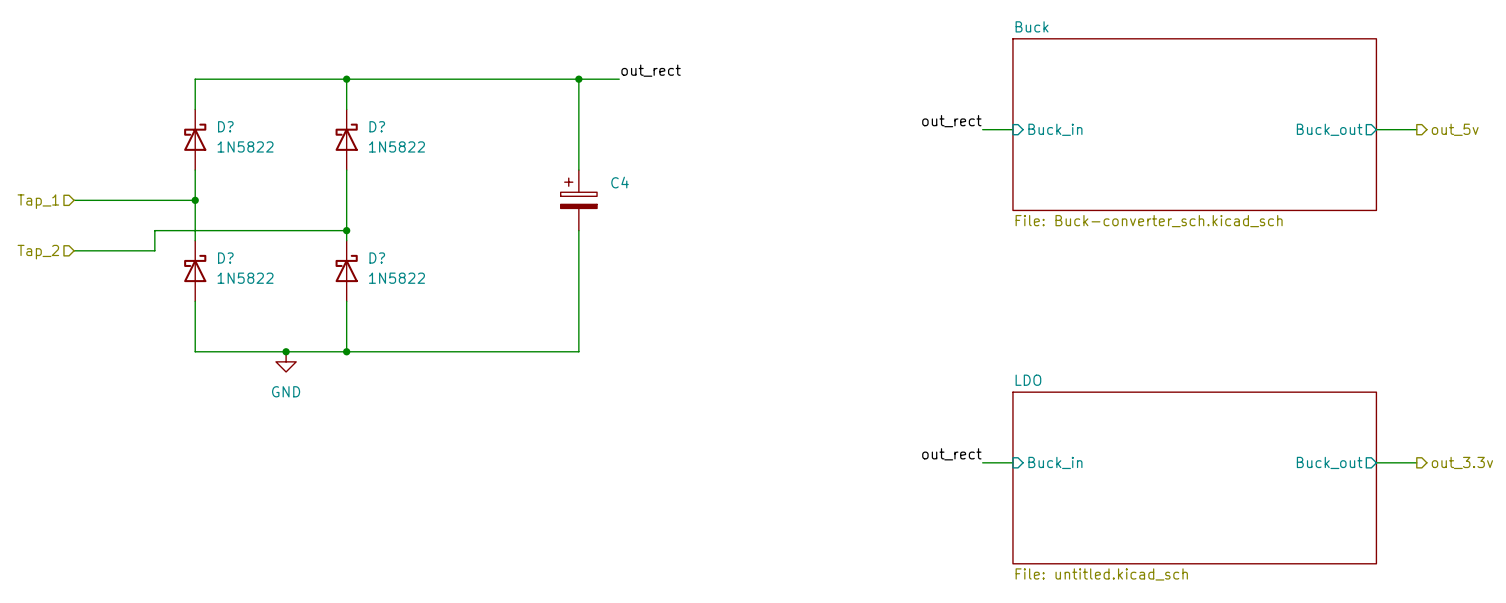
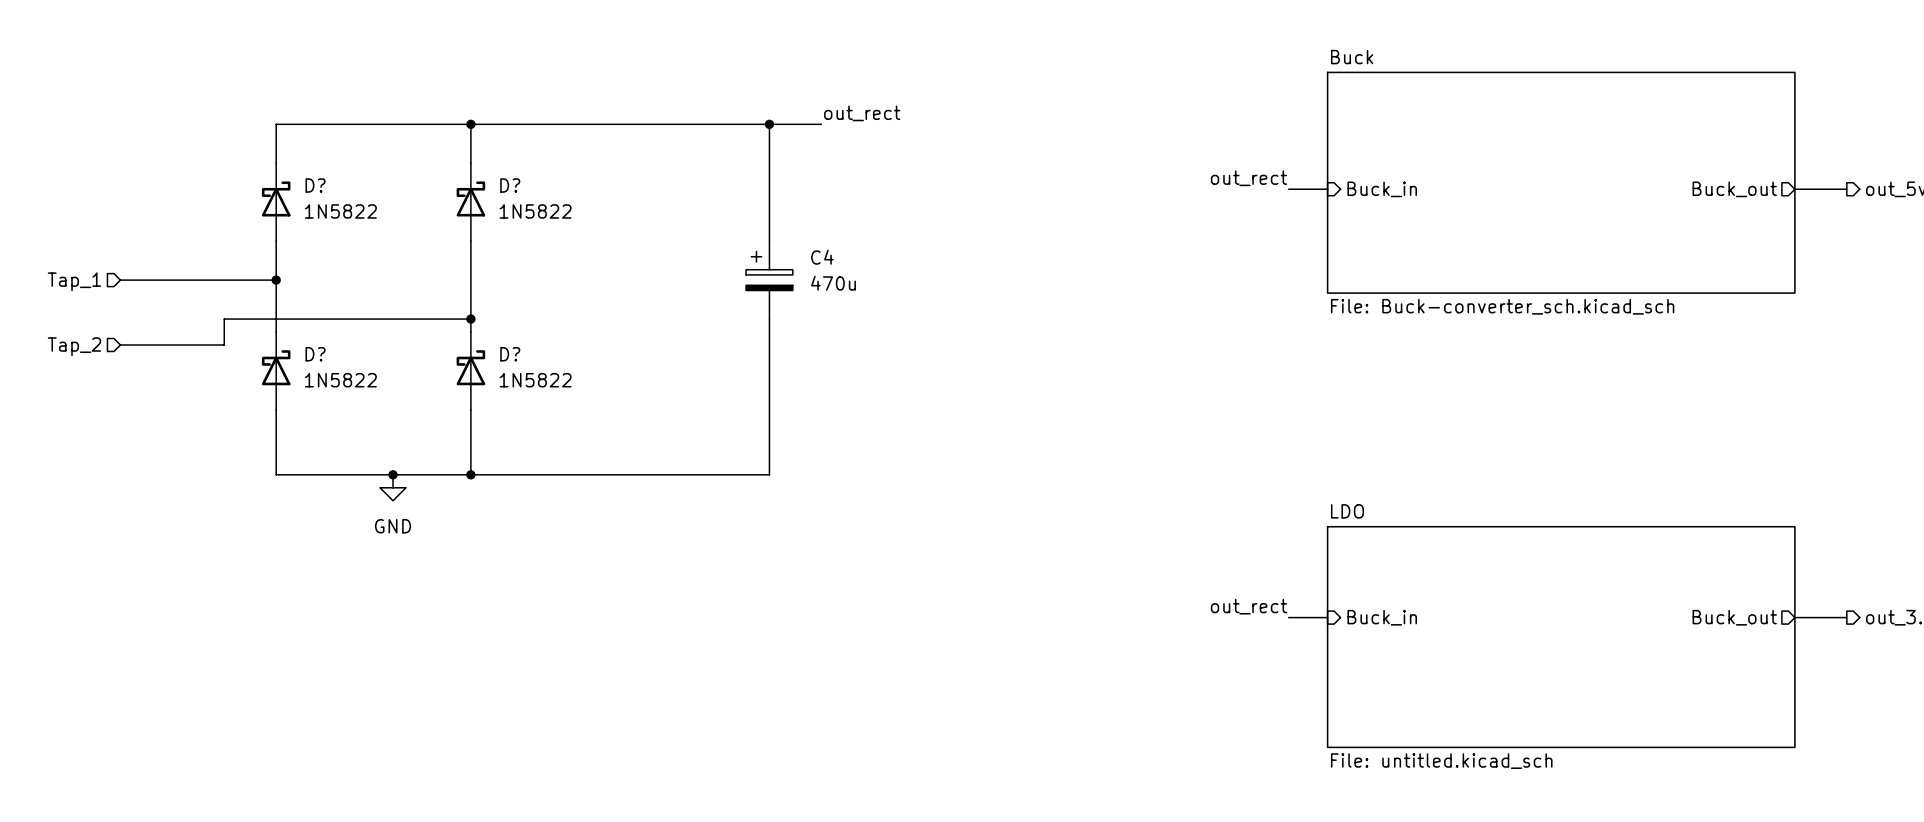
C4 value: none -> 470u (833, 283)

